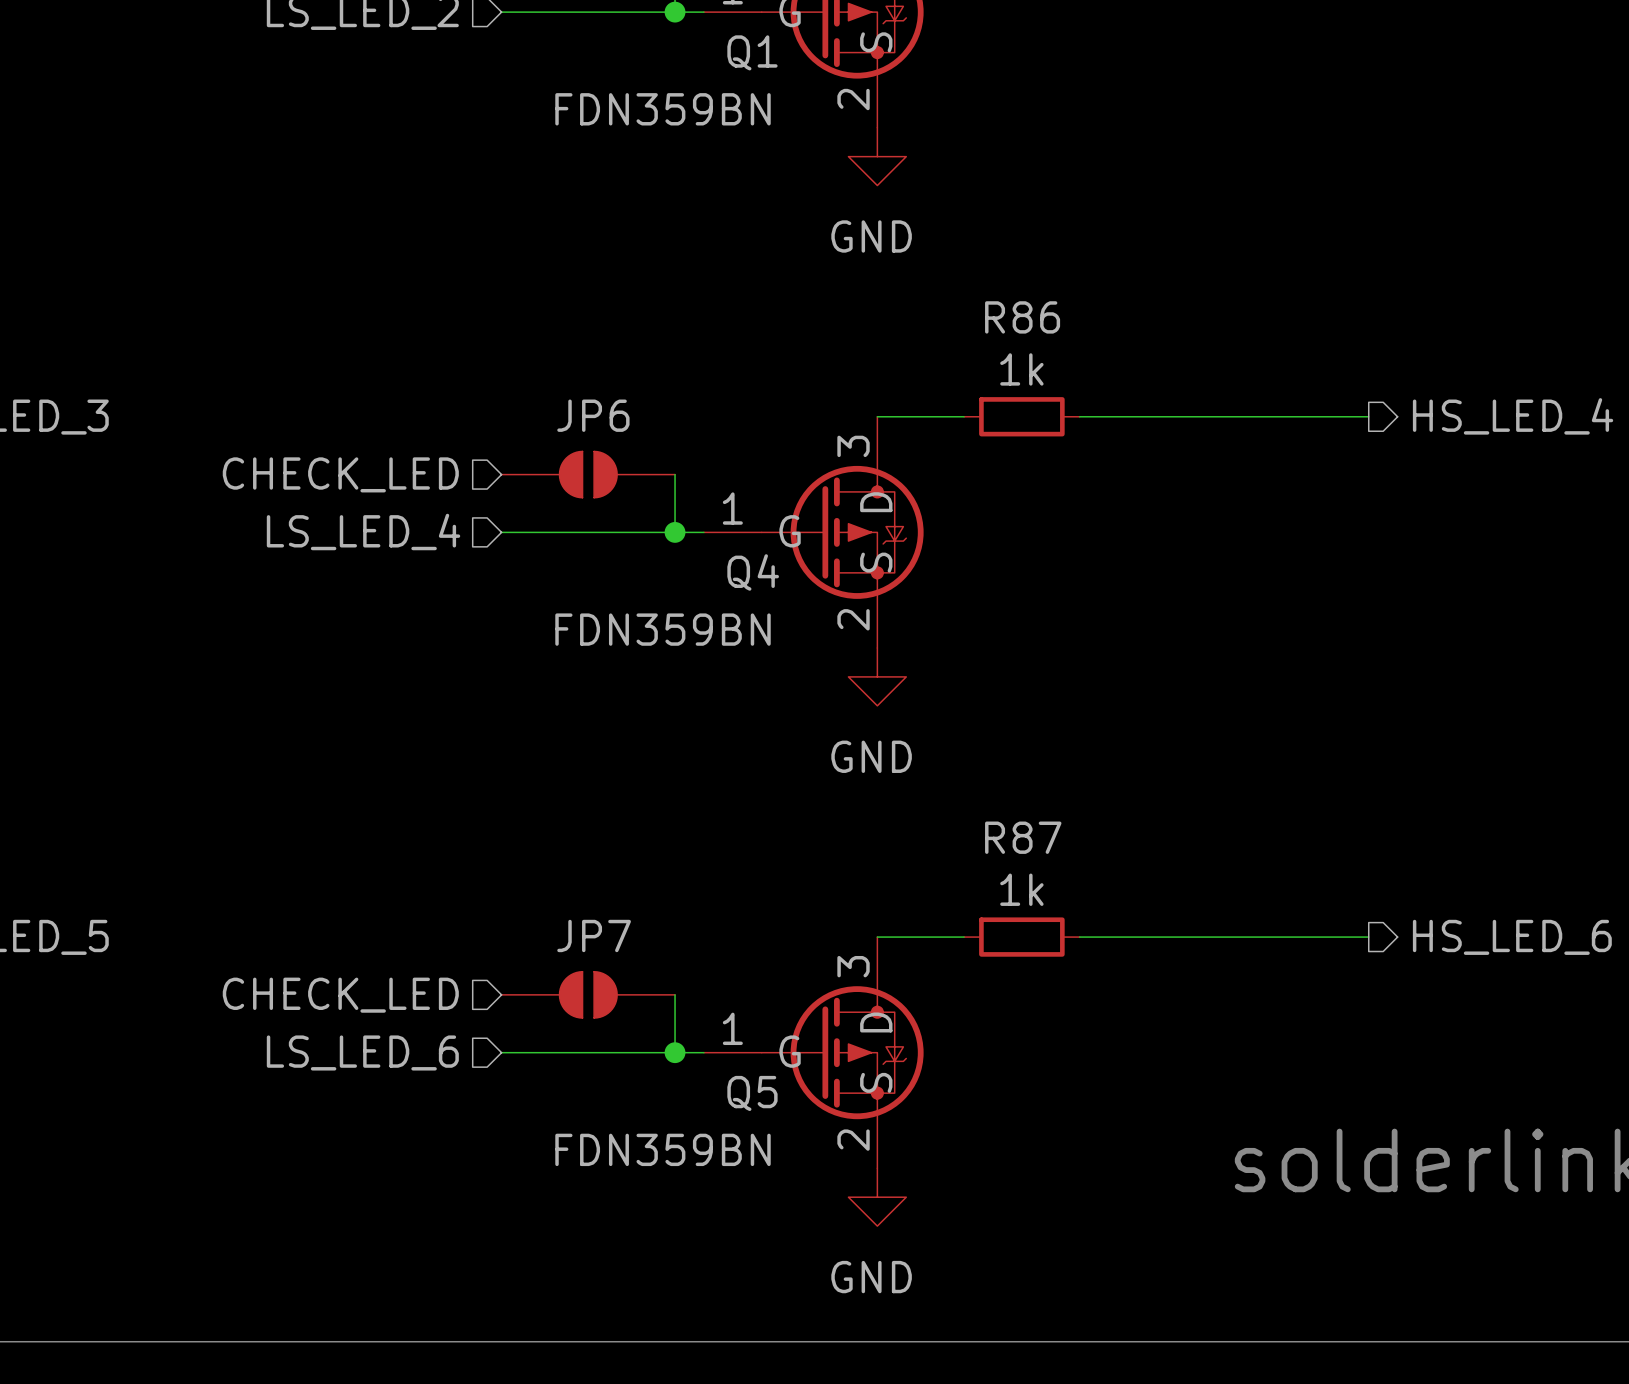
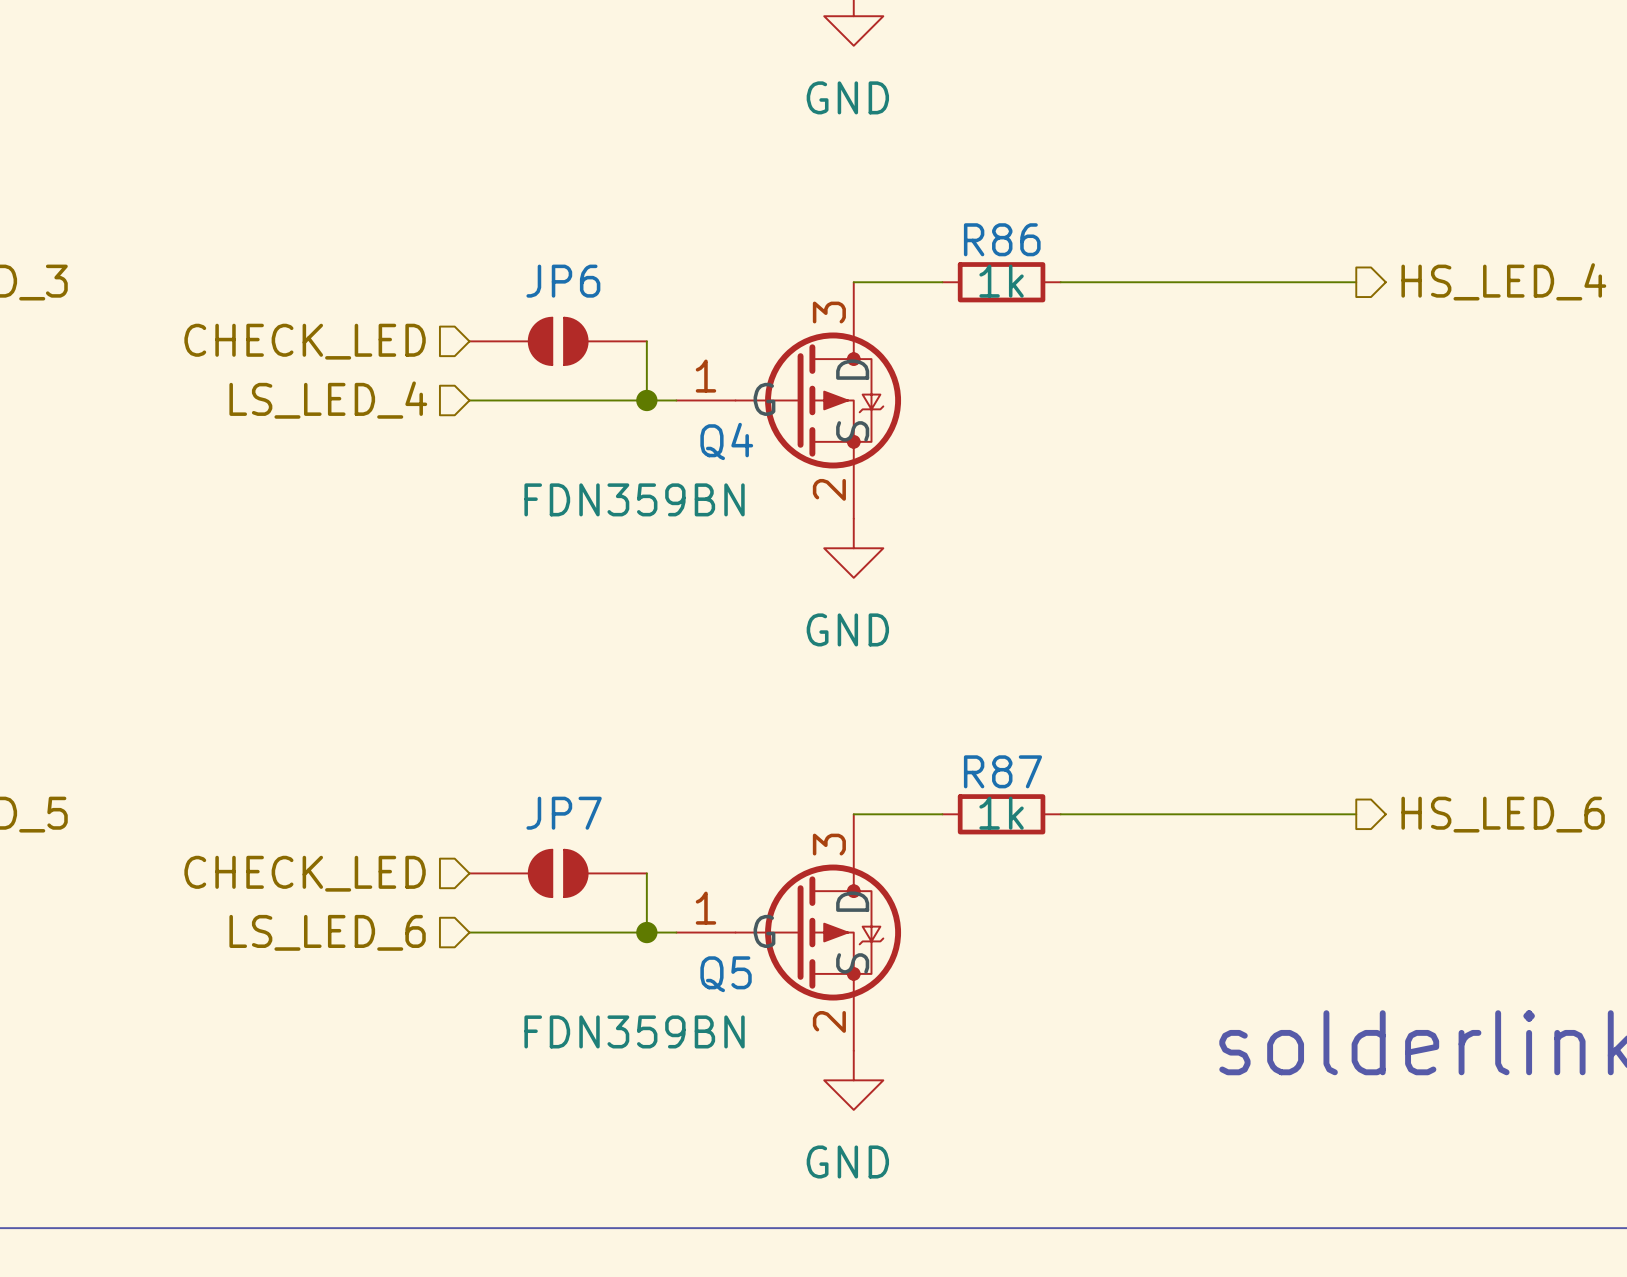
R86 name position: R86 (1022, 317) -> R86 (1002, 239)
R86 value position: 1k (1021, 369) -> 1k (1001, 281)
R87 name position: R87 (1023, 837) -> R87 (1002, 771)
R87 value position: 1k (1021, 889) -> 1k (1001, 813)

